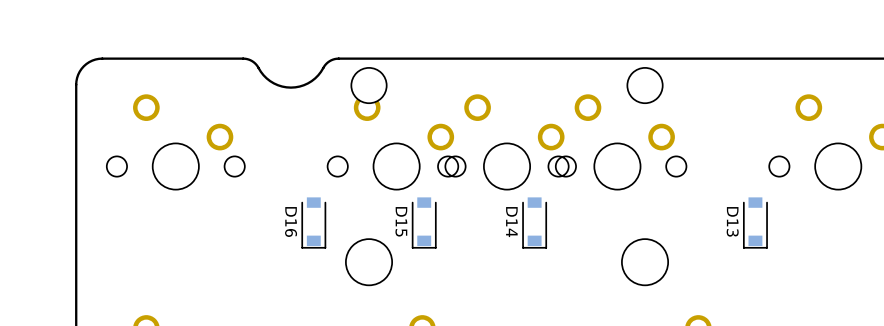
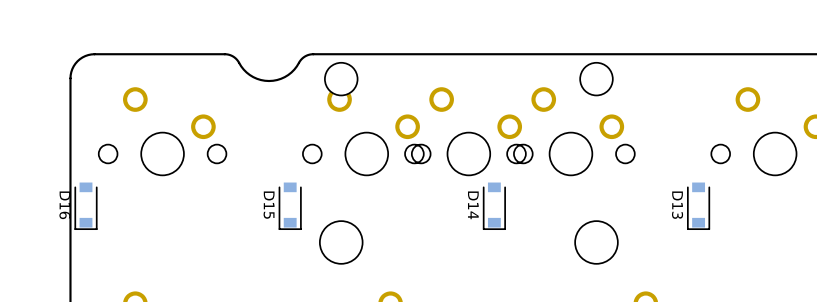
D16: none -> (86, 206)
D16 name: D16 (291, 222) -> D15 (269, 205)
D15: (424, 222) -> none

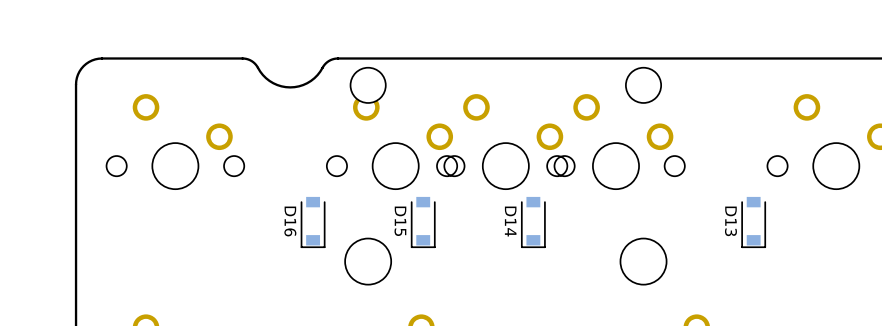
D15 name: D15 (269, 205) -> D16 (290, 221)
D16: (86, 206) -> none
D15: none -> (423, 222)

